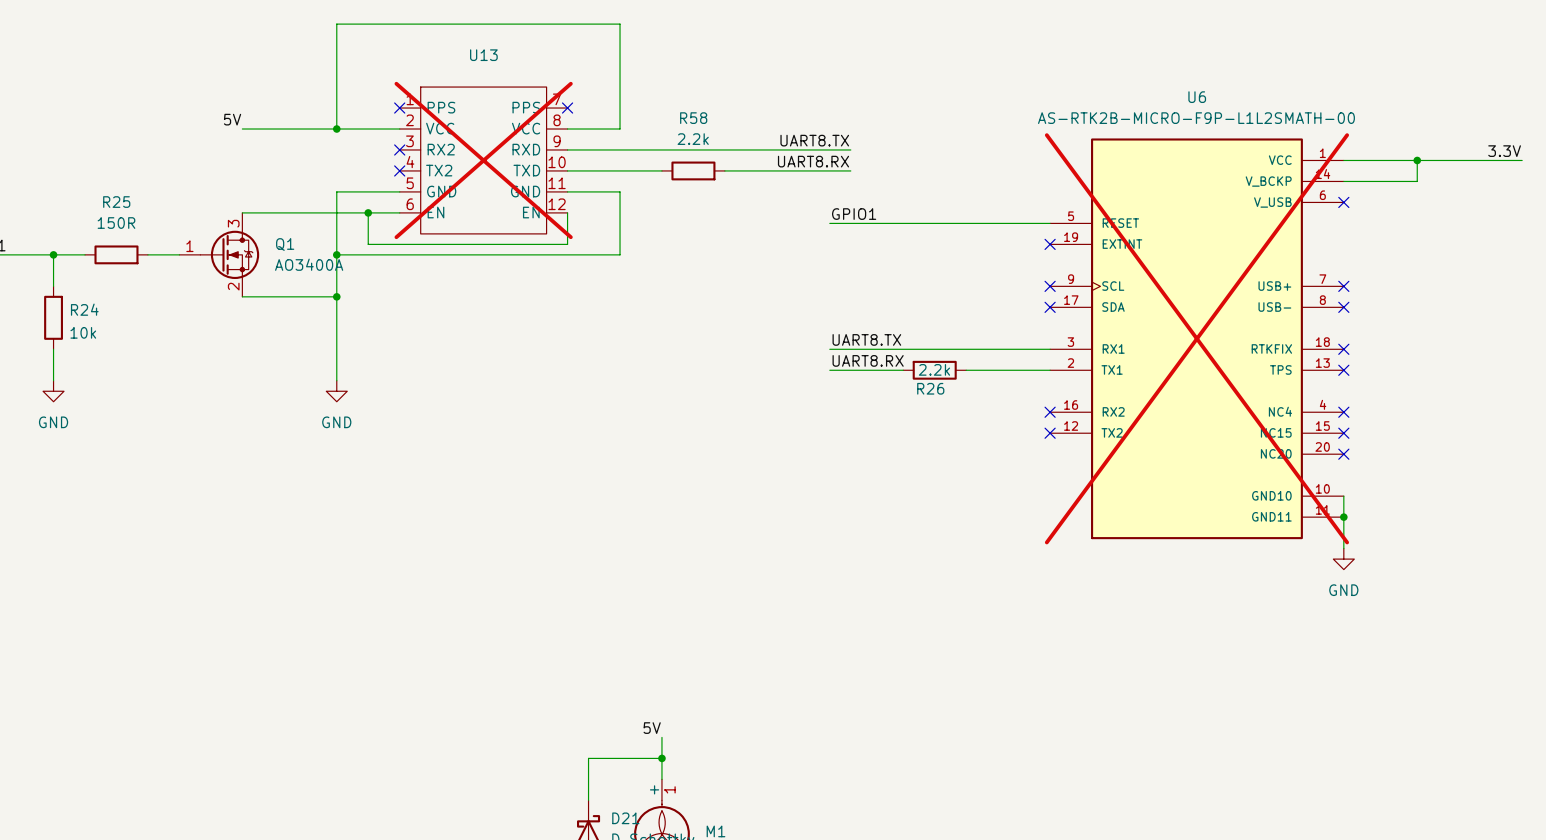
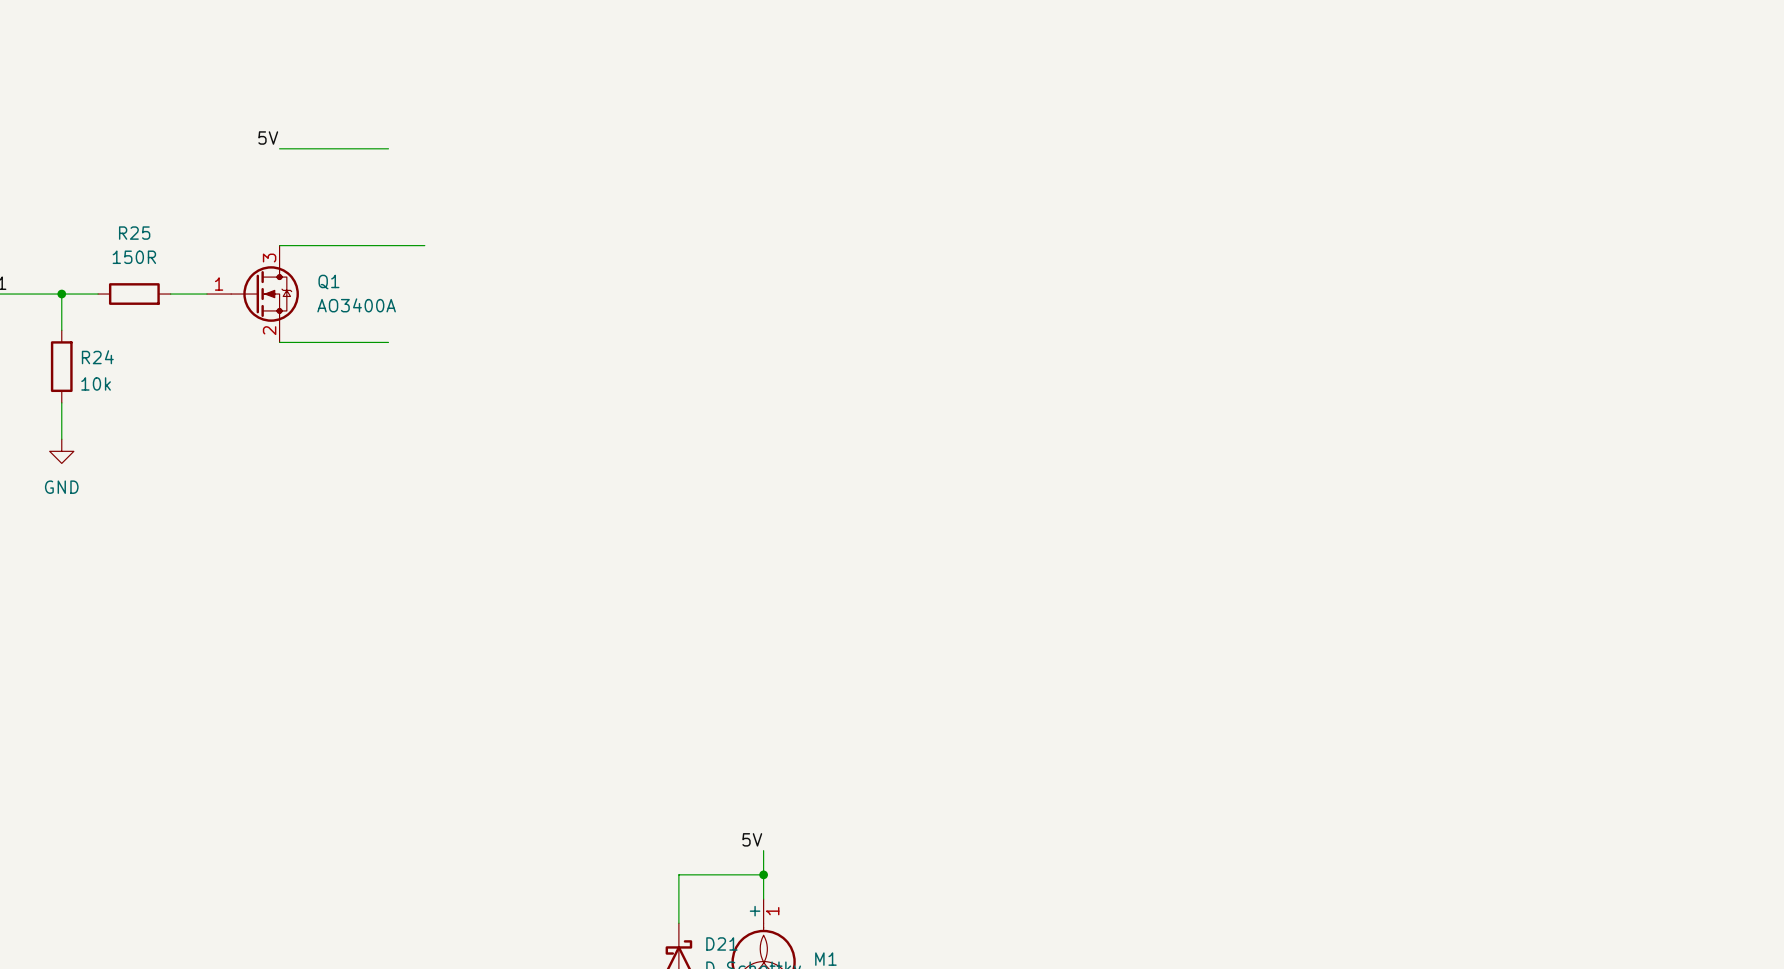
no-connect mark: (399, 108) -> none
no-connect mark: (567, 108) -> none
junction: (336, 129) -> none
wire: (399, 129) (336, 129) (336, 24) (620, 24) (620, 129) (567, 129) -> none
label: UART8.TX (814, 140) -> none
no-connect mark: (399, 149) -> none
wire: (567, 149) (850, 149) -> none
label: 3.3V (1504, 151) -> none
U13: (483, 160) -> none
wire: (1343, 160) (1522, 160) -> none
wire: (1417, 160) (1417, 181) (1343, 181) -> none
junction: (1417, 160) -> none
label: UART8.RX (813, 161) -> none
no-connect mark: (399, 170) -> none
wire: (567, 170) (661, 170) -> none
R58: 2.2k (693, 170) -> none
wire: (724, 170) (850, 170) -> none
wire: (399, 191) (336, 191) (336, 380) -> none
wire: (567, 191) (620, 191) (620, 254) (336, 254) -> none
no-connect mark: (1343, 202) -> none
junction: (368, 212) -> none
wire: (399, 212) (368, 212) (368, 244) (567, 244) (567, 212) -> none
label: GPIO1 (854, 214) -> none
wire: (829, 223) (1050, 223) -> none
no-connect mark: (1050, 244) -> none
junction: (336, 254) -> none
no-connect mark: (1050, 286) -> none
no-connect mark: (1343, 286) -> none
junction: (336, 296) -> none
no-connect mark: (1050, 307) -> none
no-connect mark: (1343, 307) -> none
U6: AS-RTK2B-MICRO-F9P-L1L2SMATH-00 (1196, 338) -> none
label: UART8.TX (866, 339) -> none
wire: (829, 349) (1050, 349) -> none
no-connect mark: (1343, 349) -> none
label: UART8.RX (868, 360) -> none
wire: (829, 370) (903, 370) -> none
R26: 2.2k (934, 370) -> none
wire: (966, 370) (1050, 370) -> none
no-connect mark: (1343, 370) -> none
power symbol: GND (336, 391) -> none
no-connect mark: (1050, 412) -> none
no-connect mark: (1343, 412) -> none
no-connect mark: (1050, 433) -> none
no-connect mark: (1343, 433) -> none
no-connect mark: (1343, 454) -> none
wire: (1343, 496) (1343, 548) -> none
junction: (1343, 517) -> none
power symbol: GND (1343, 559) -> none

